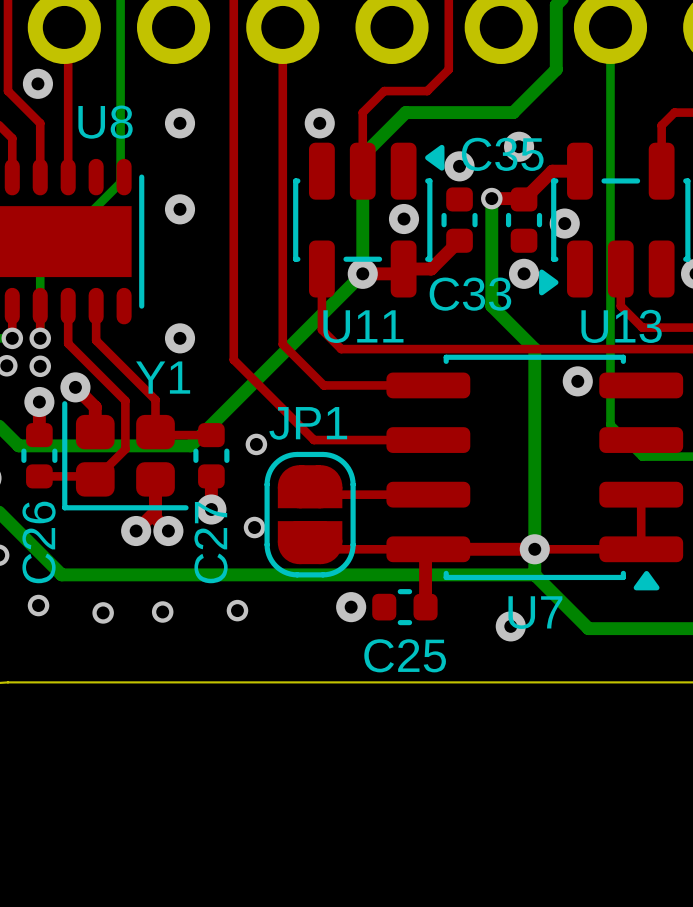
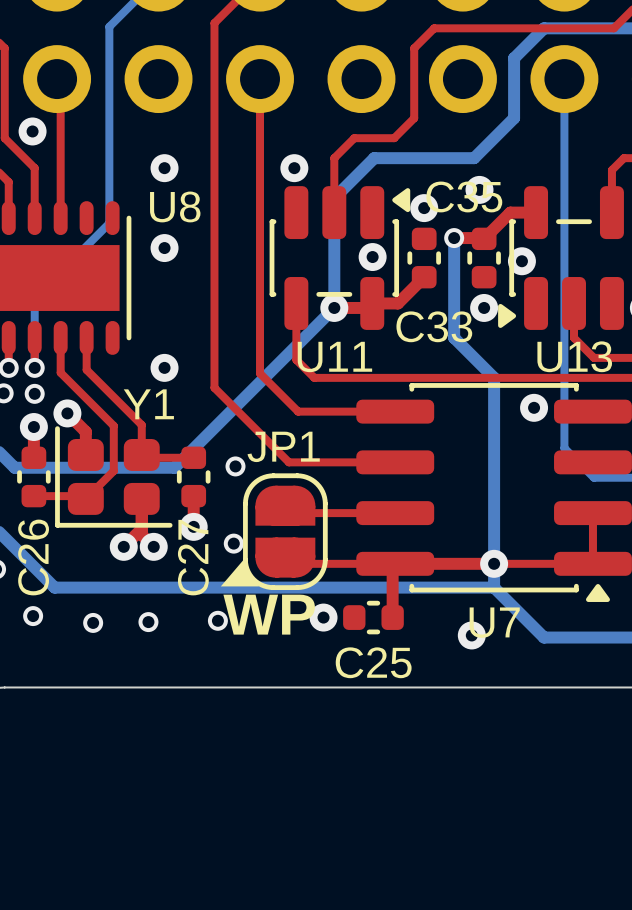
U8 name position: U8 (105, 122) -> U8 (175, 206)
drawing: none -> [220, 557, 259, 587]
text: none -> WP (269, 614)

